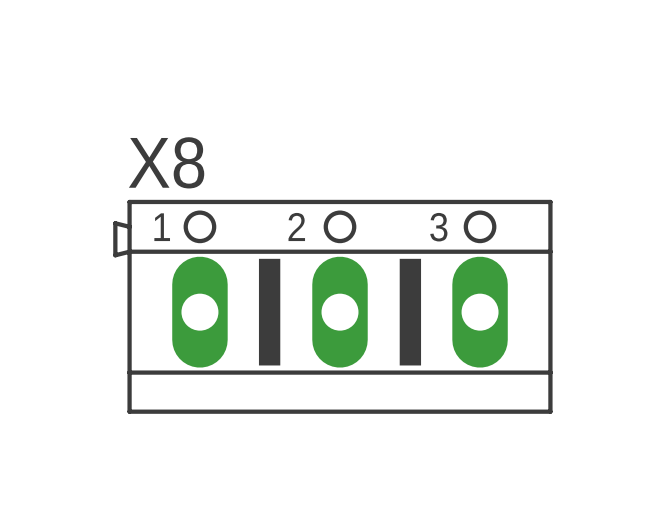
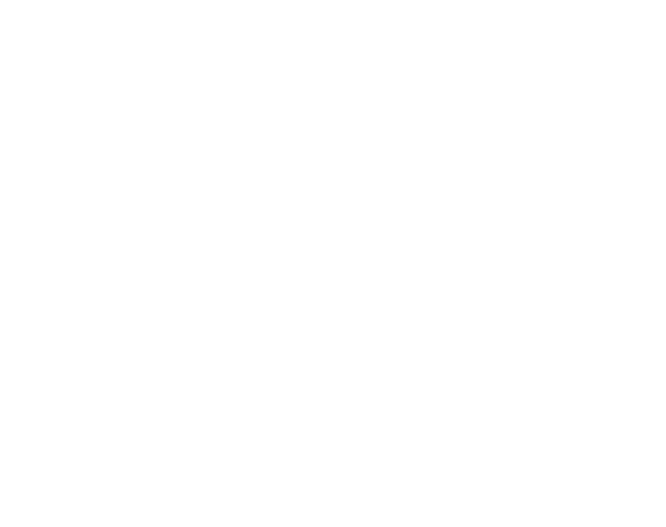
X8: (332, 306) -> none

